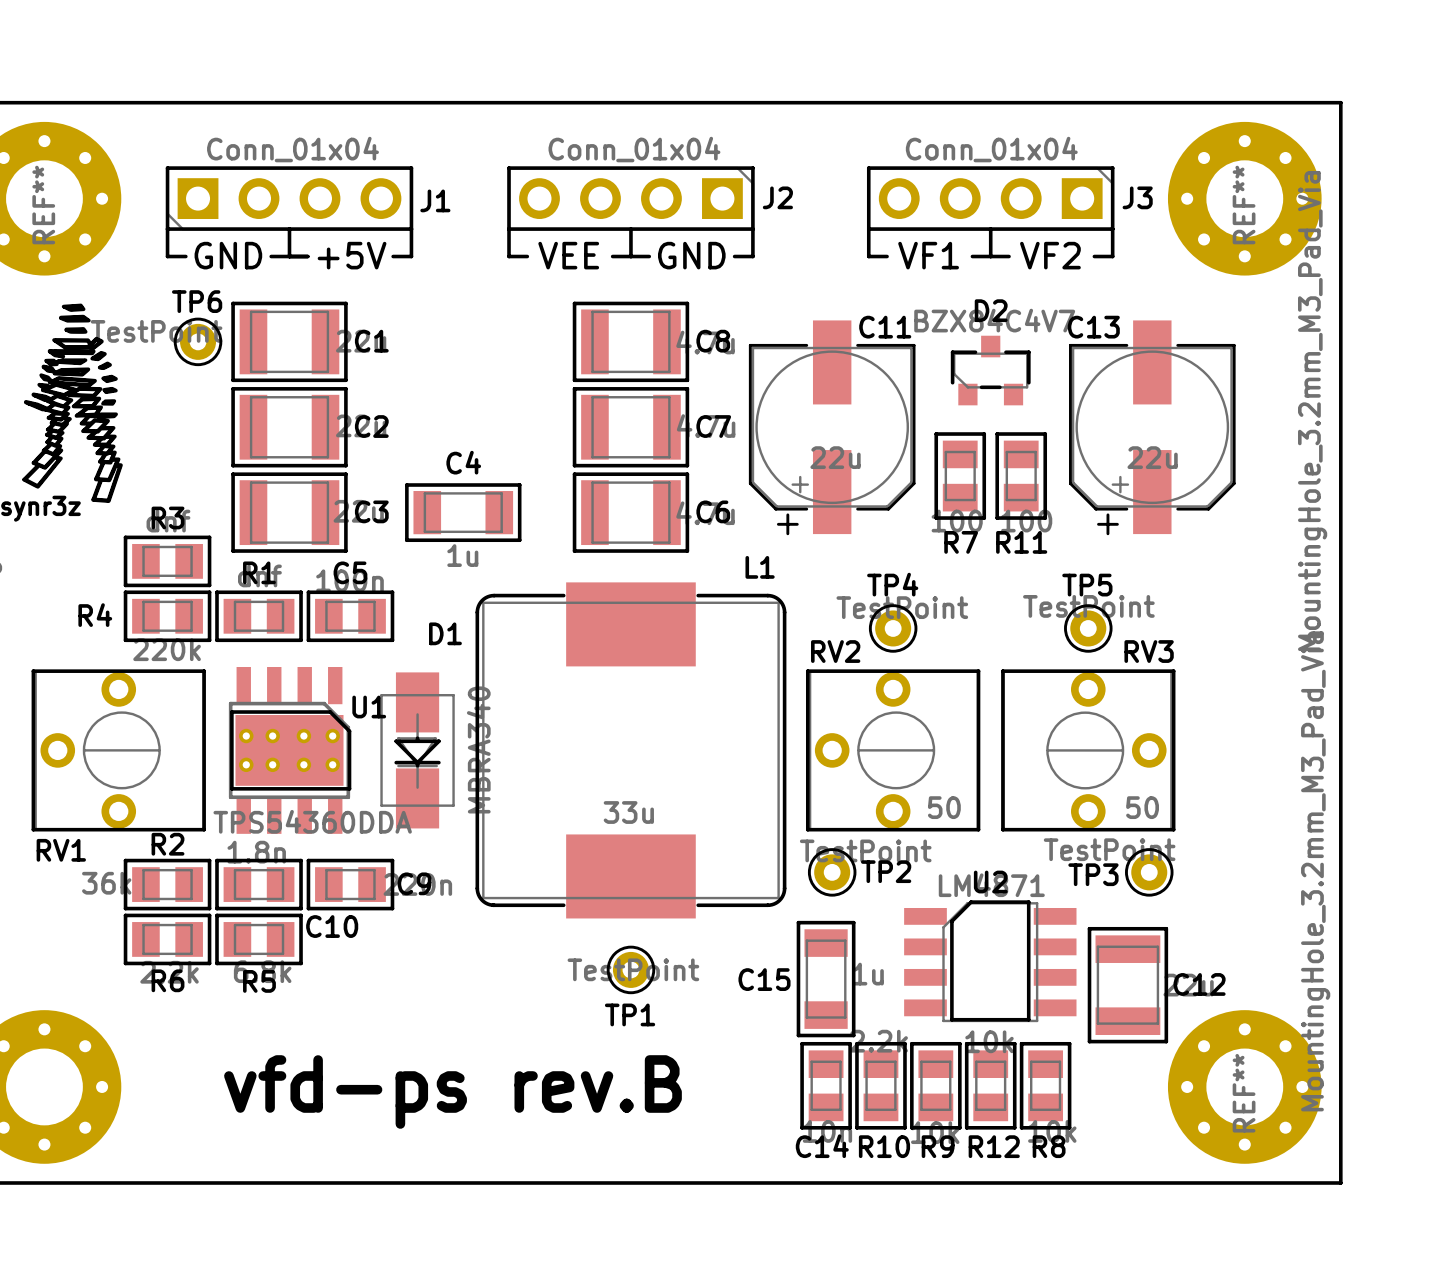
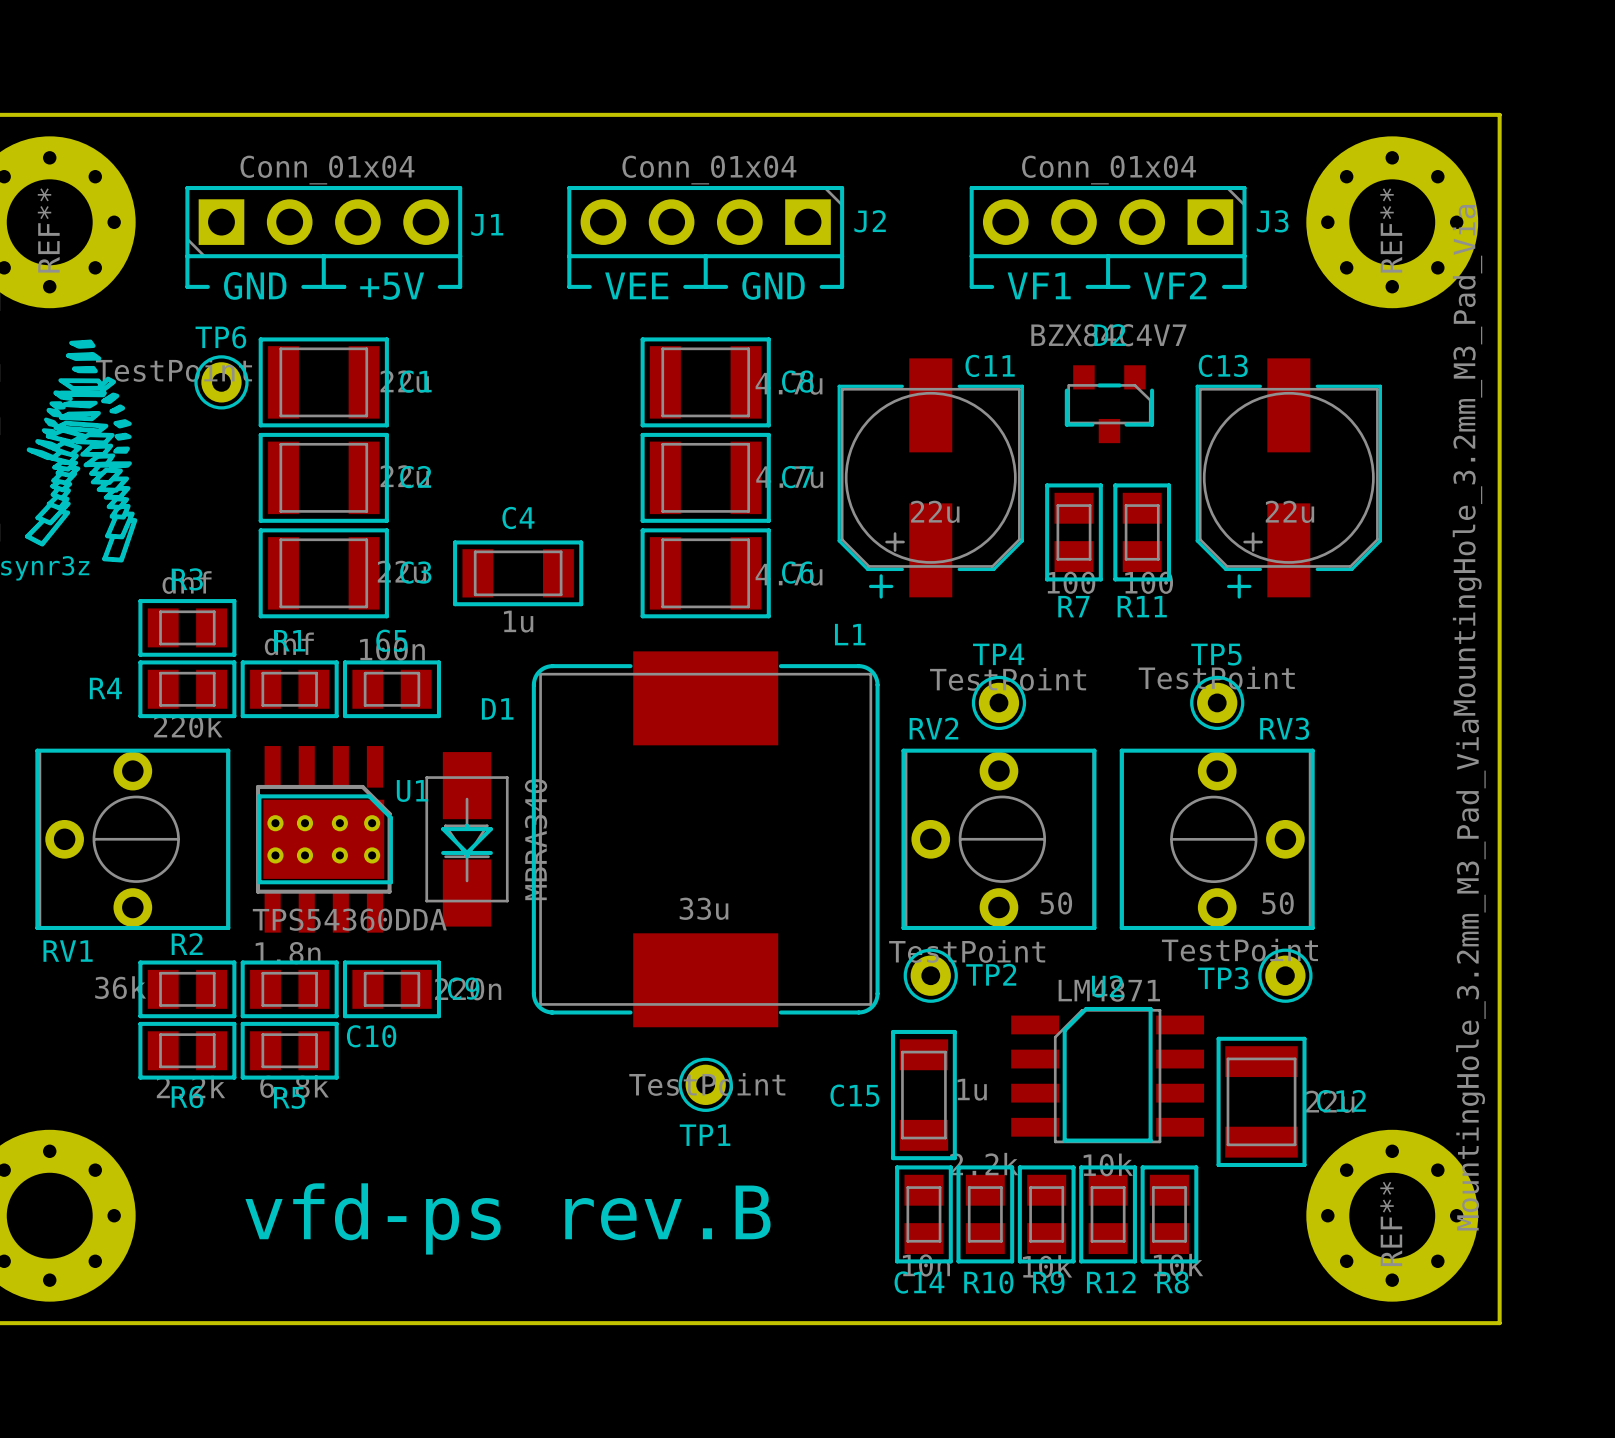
D2 rotation: 0° (990, 370) -> 180° (1109, 404)

